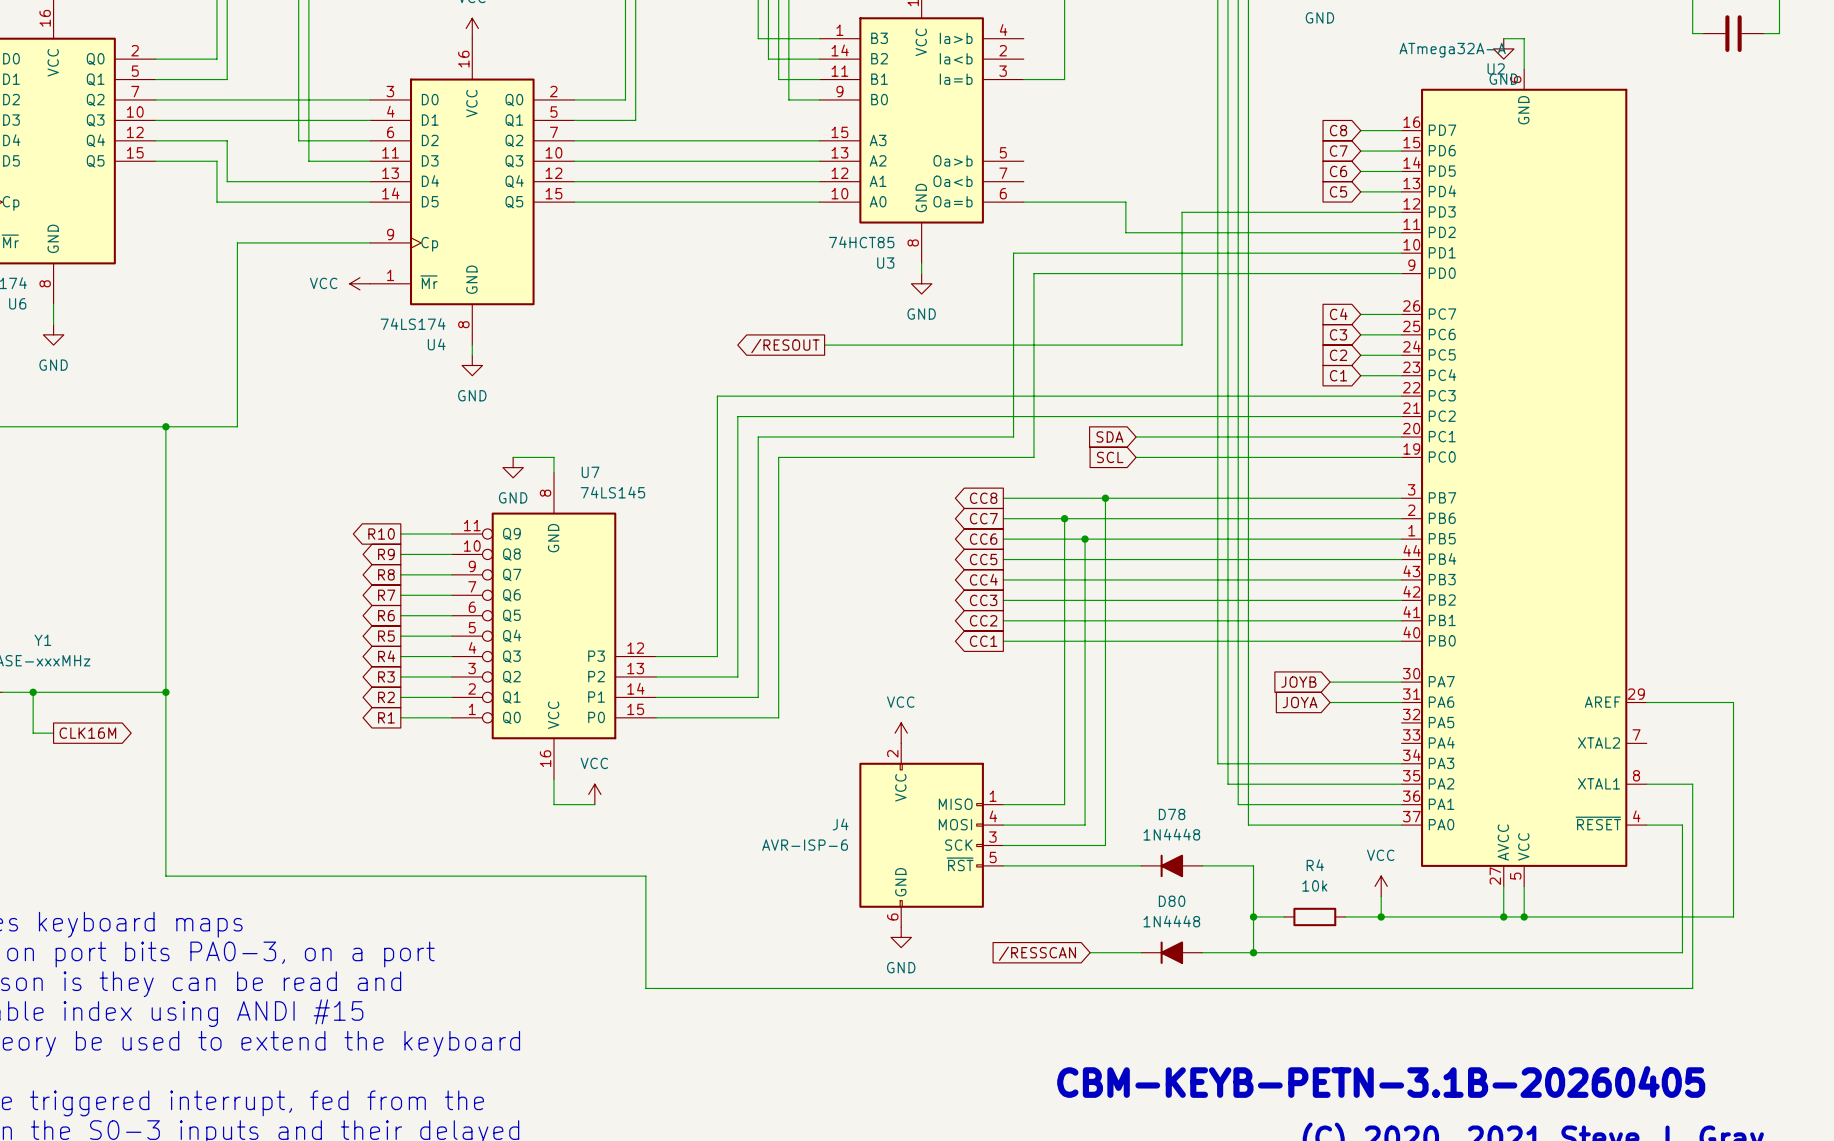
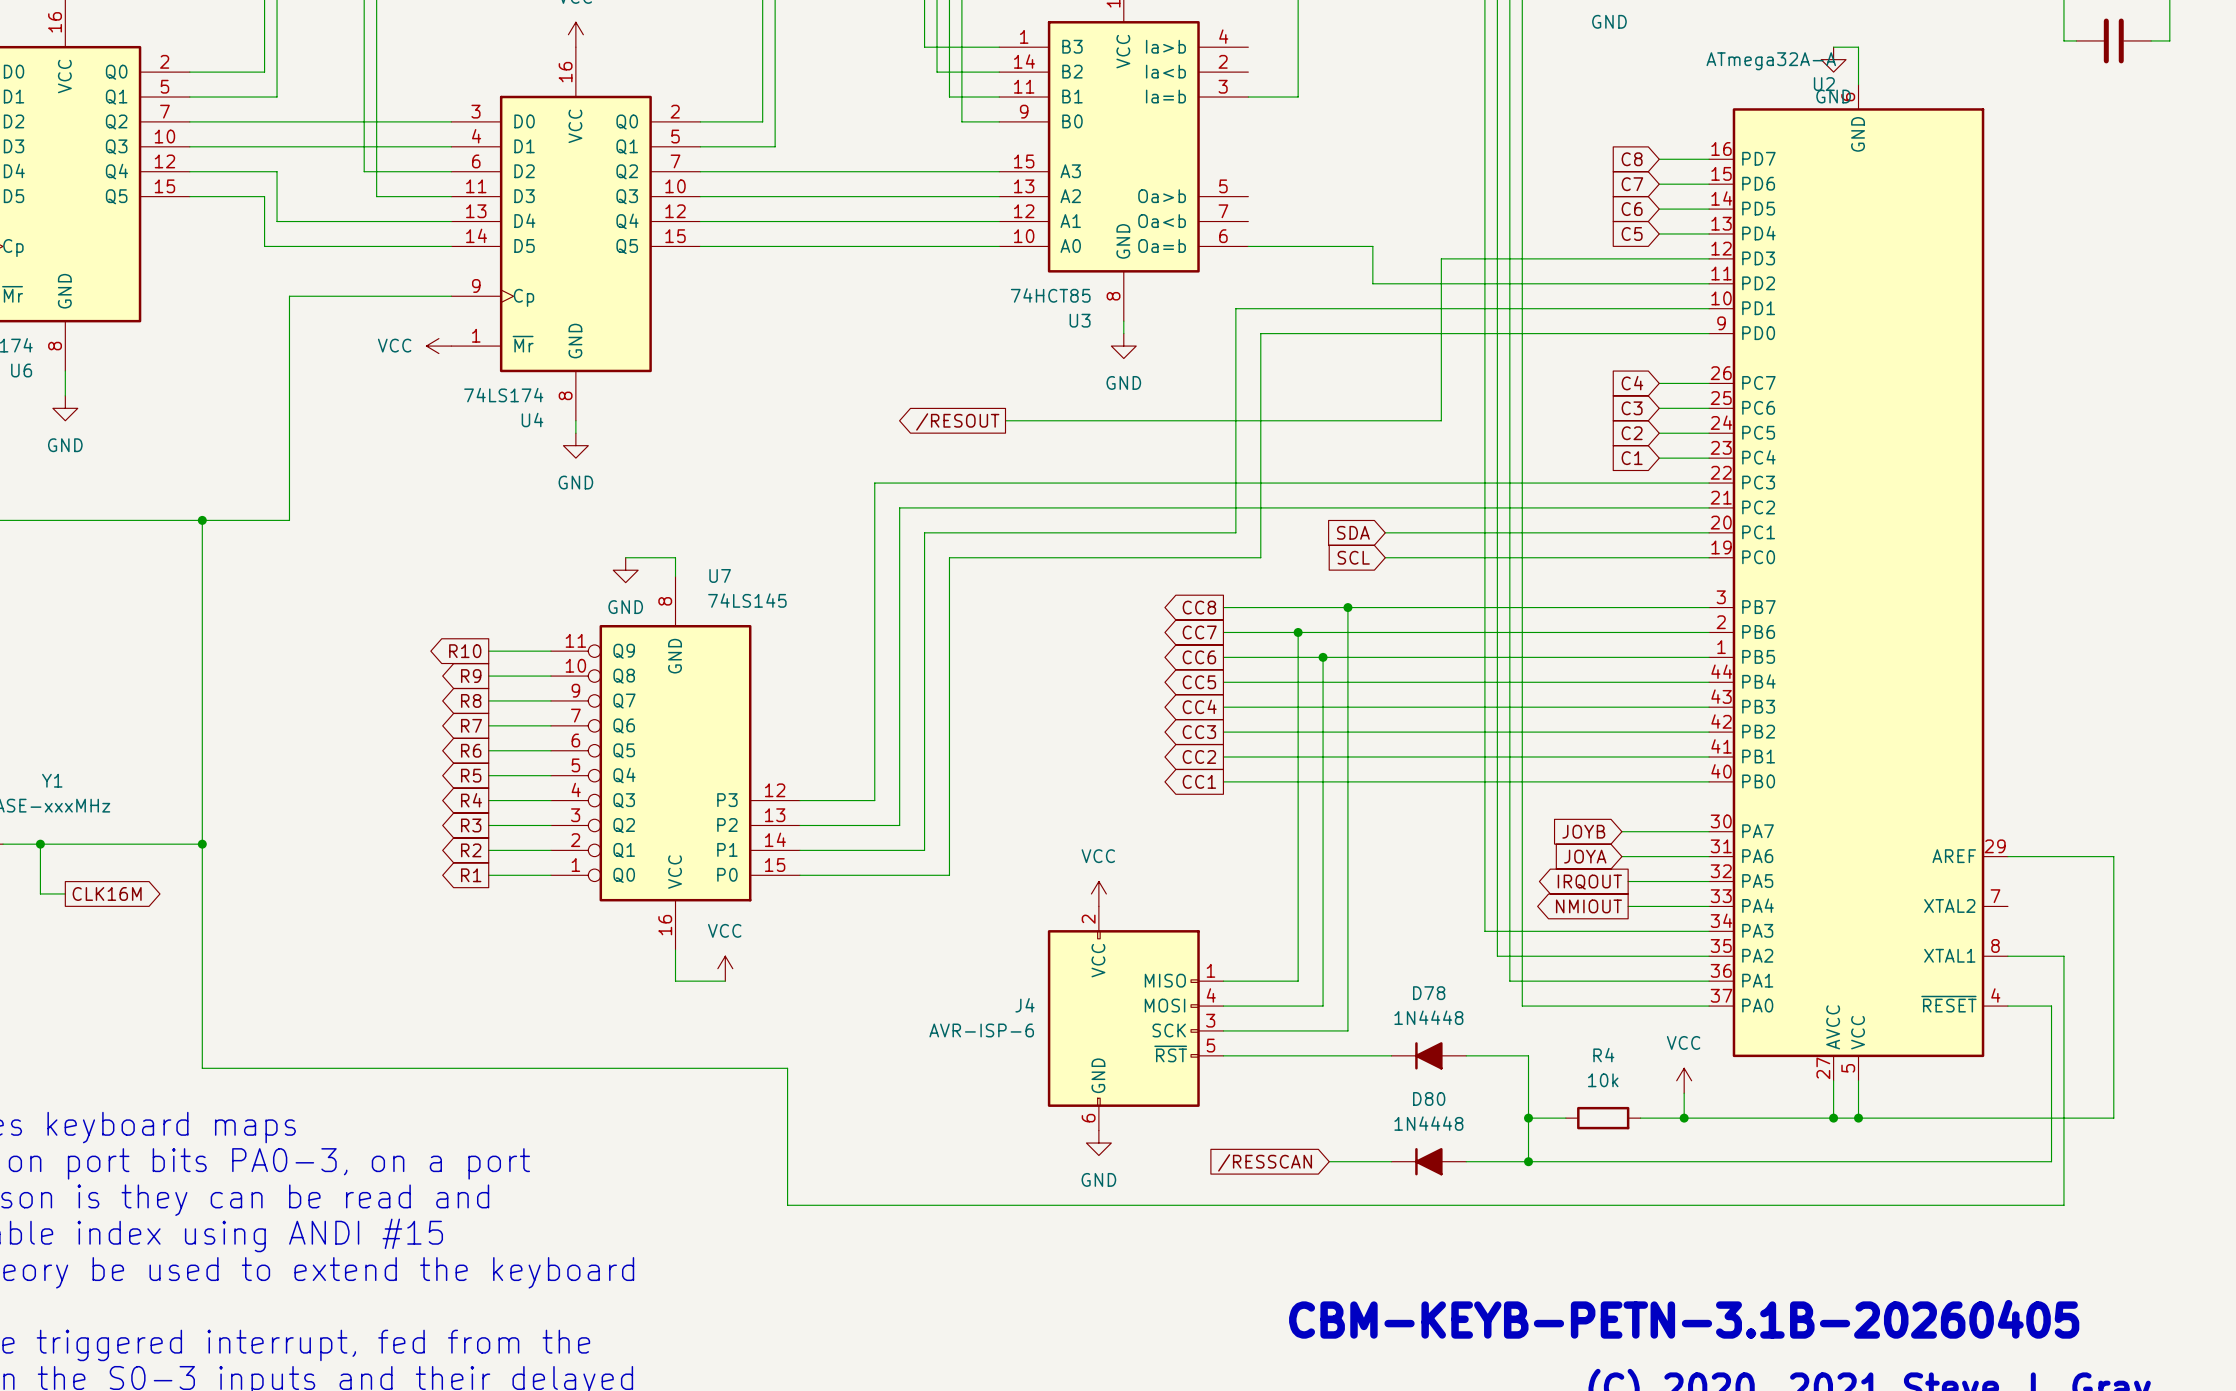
wire: none -> (1628, 881) (1709, 881)
global label: none -> IRQOUT (1589, 882)
global label: none -> NMIOUT (1588, 906)
wire: none -> (1628, 906) (1709, 906)

